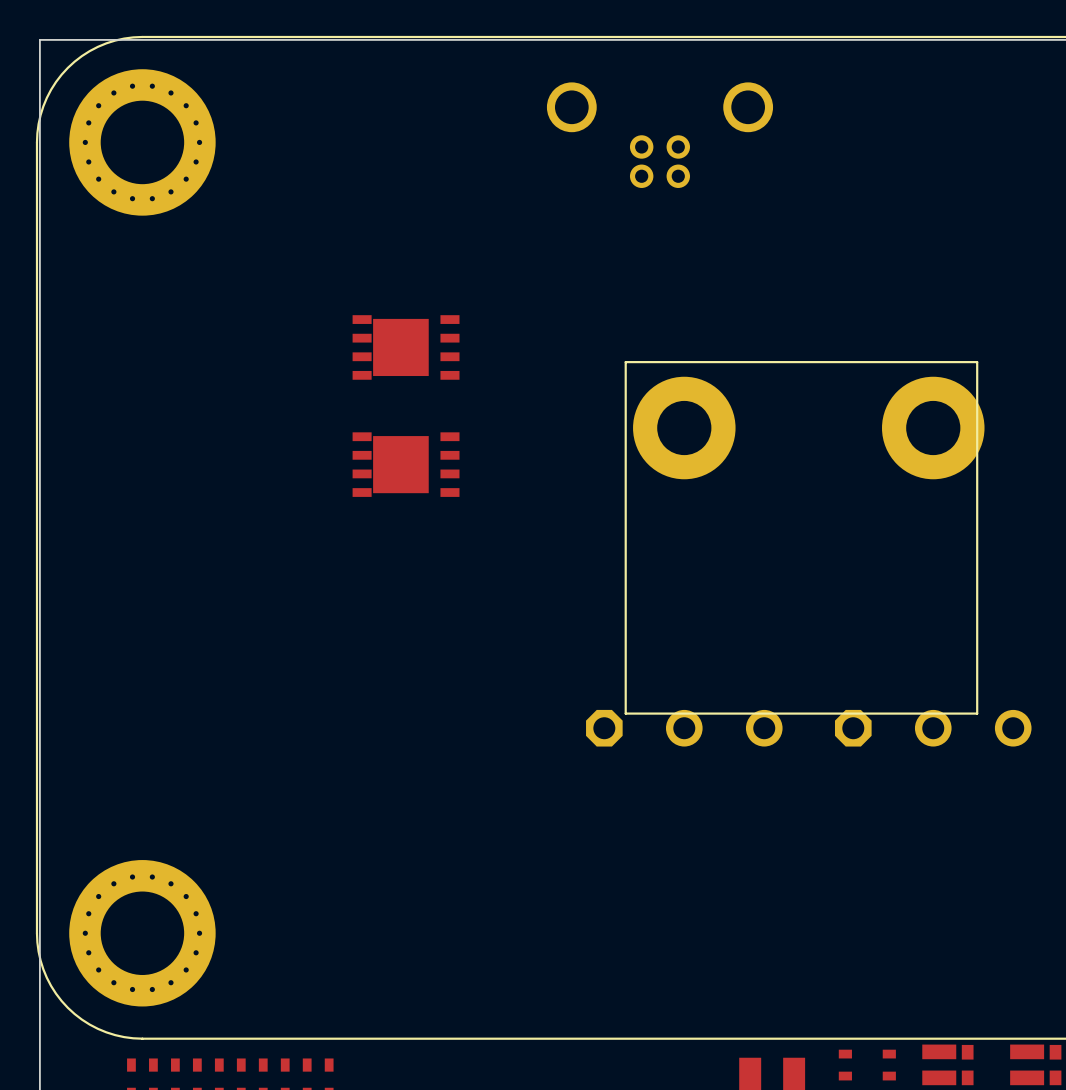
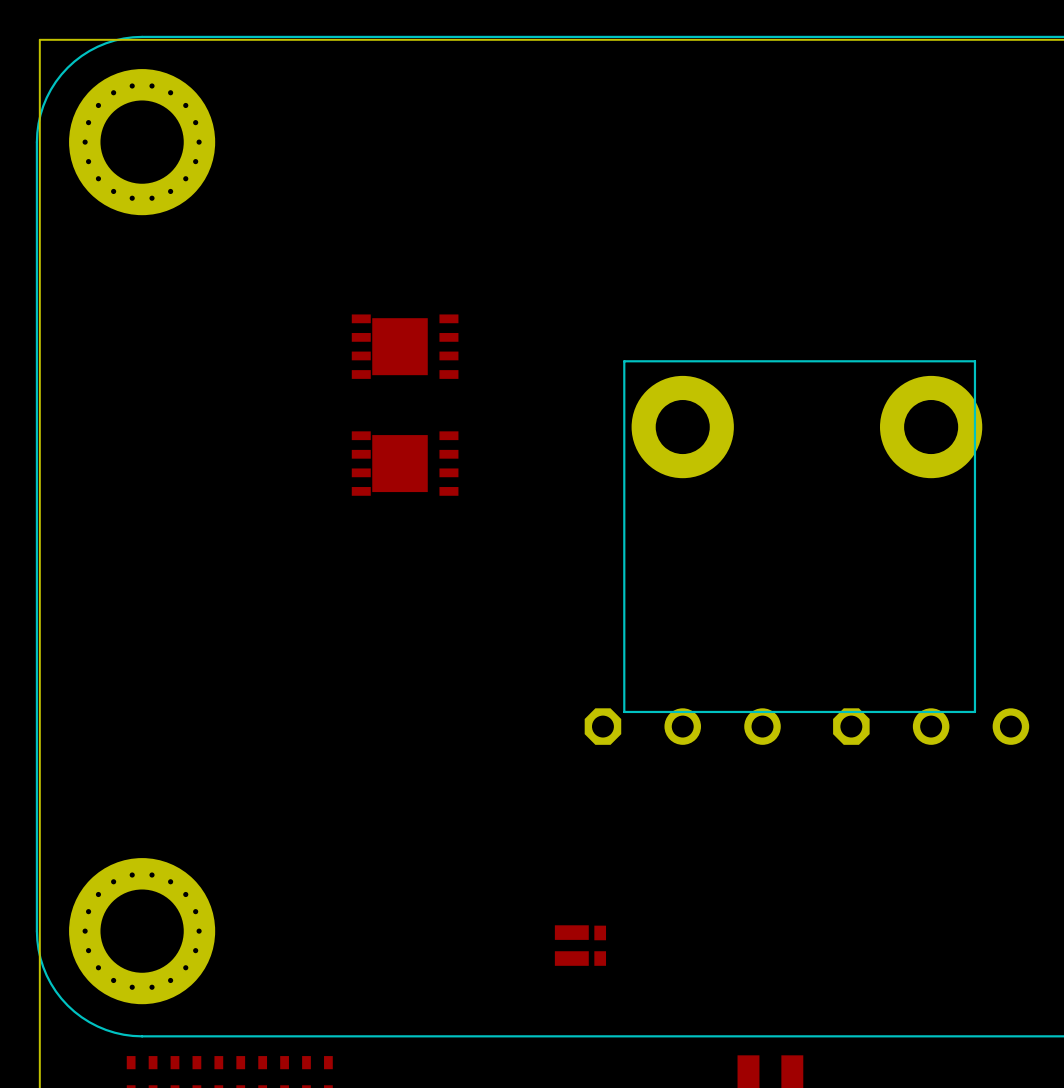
part: (659, 135) -> none
part: none -> (580, 945)
part: (947, 1064) -> none
part: (1035, 1064) -> none
part: (845, 1065) -> none
part: (889, 1065) -> none

